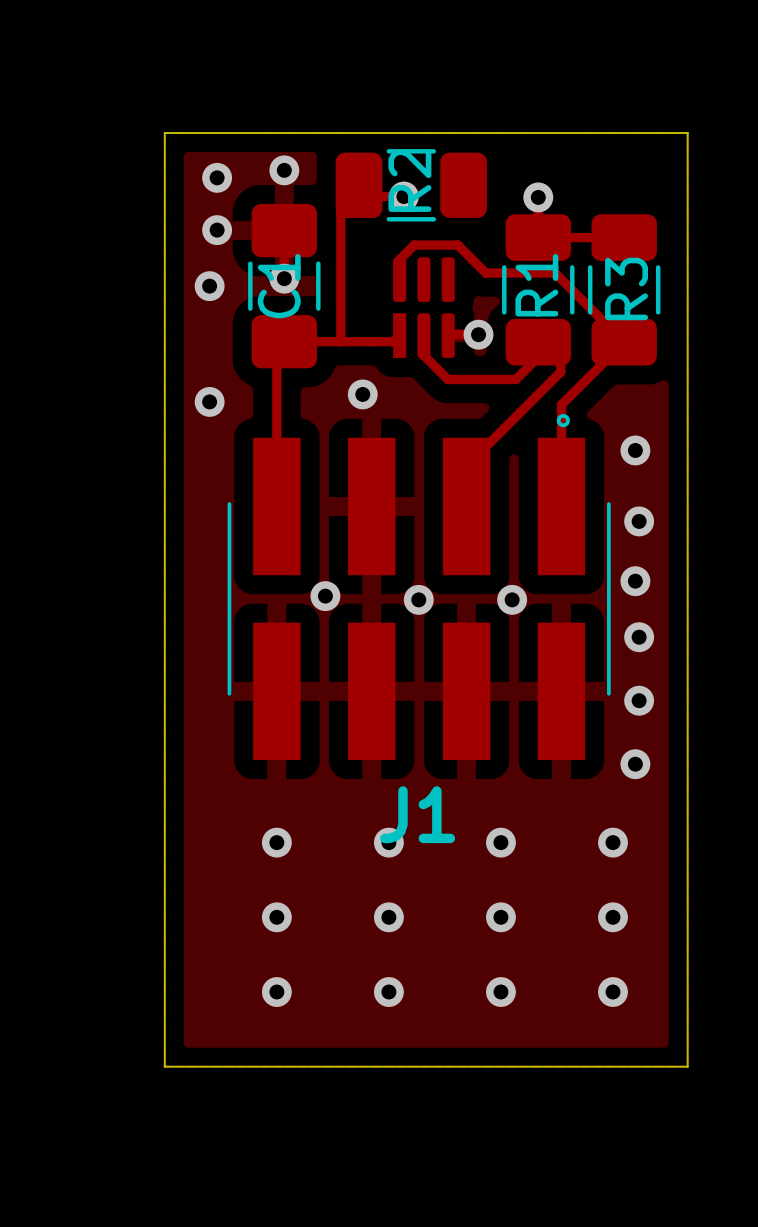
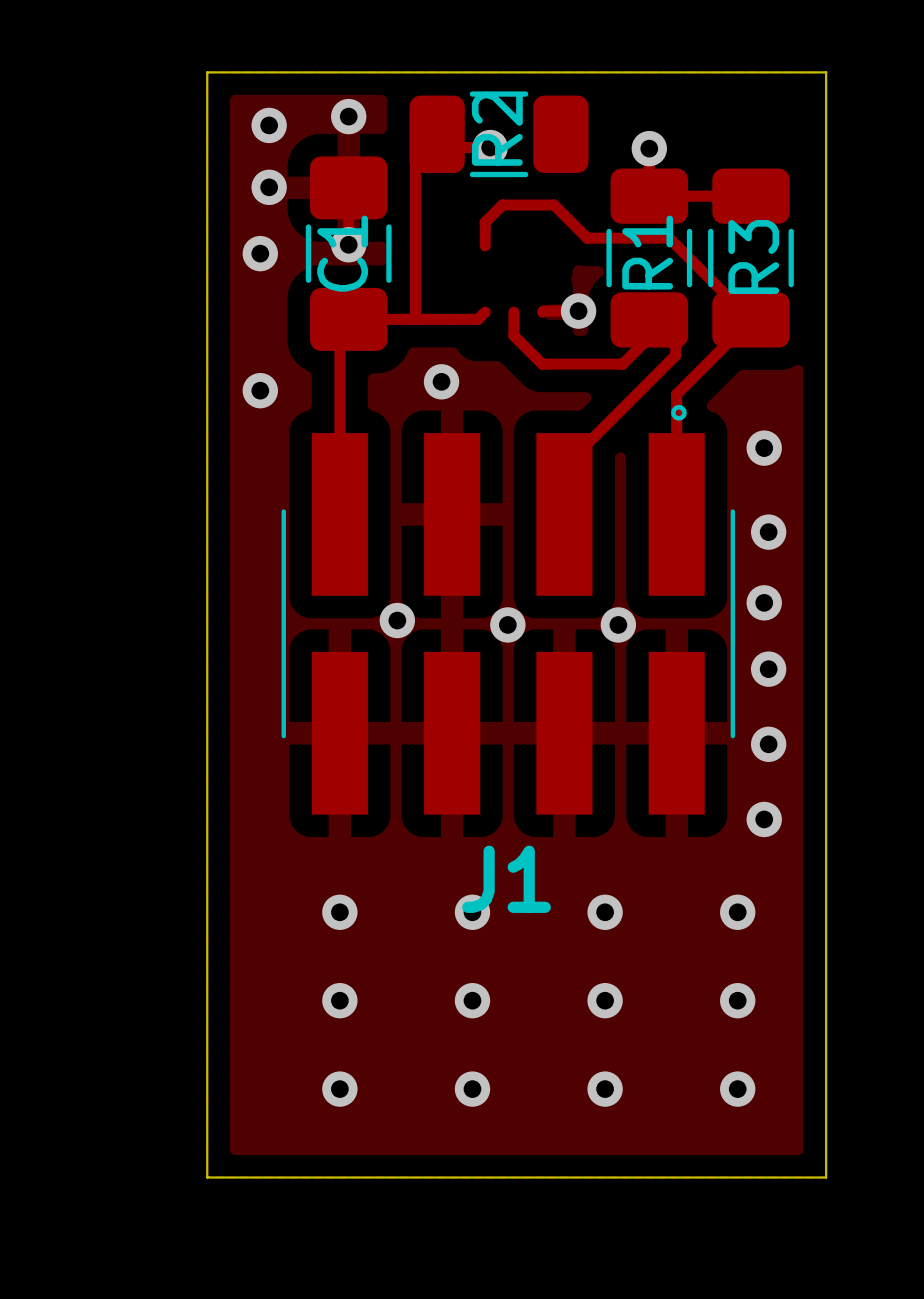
part: (423, 307) -> none

